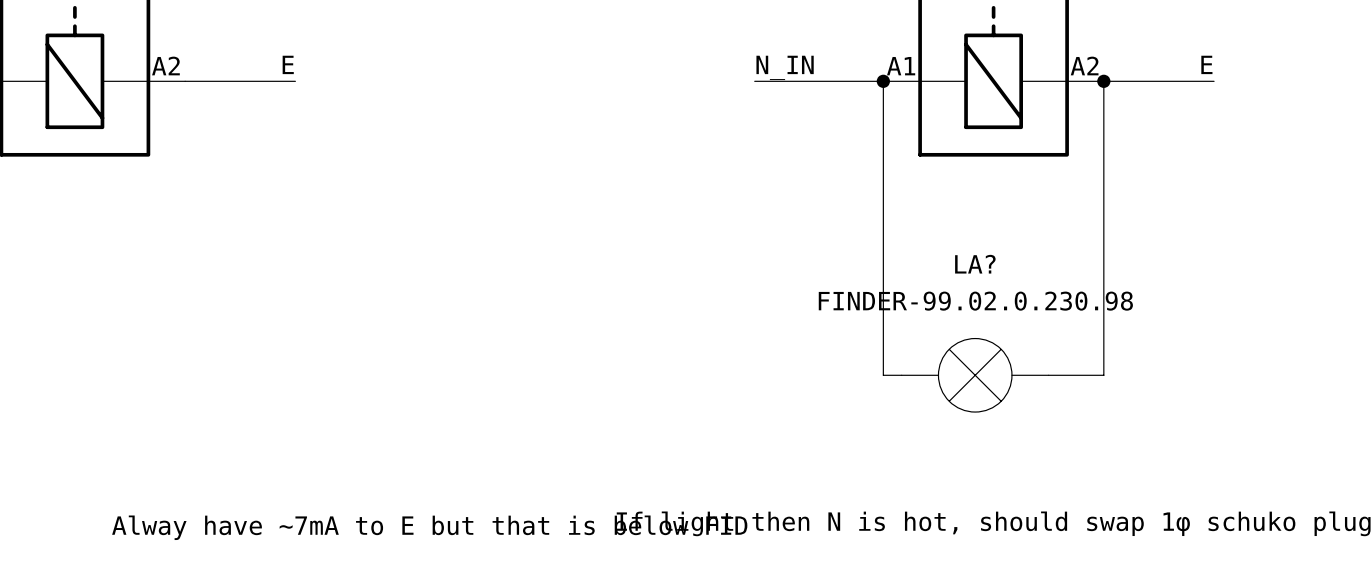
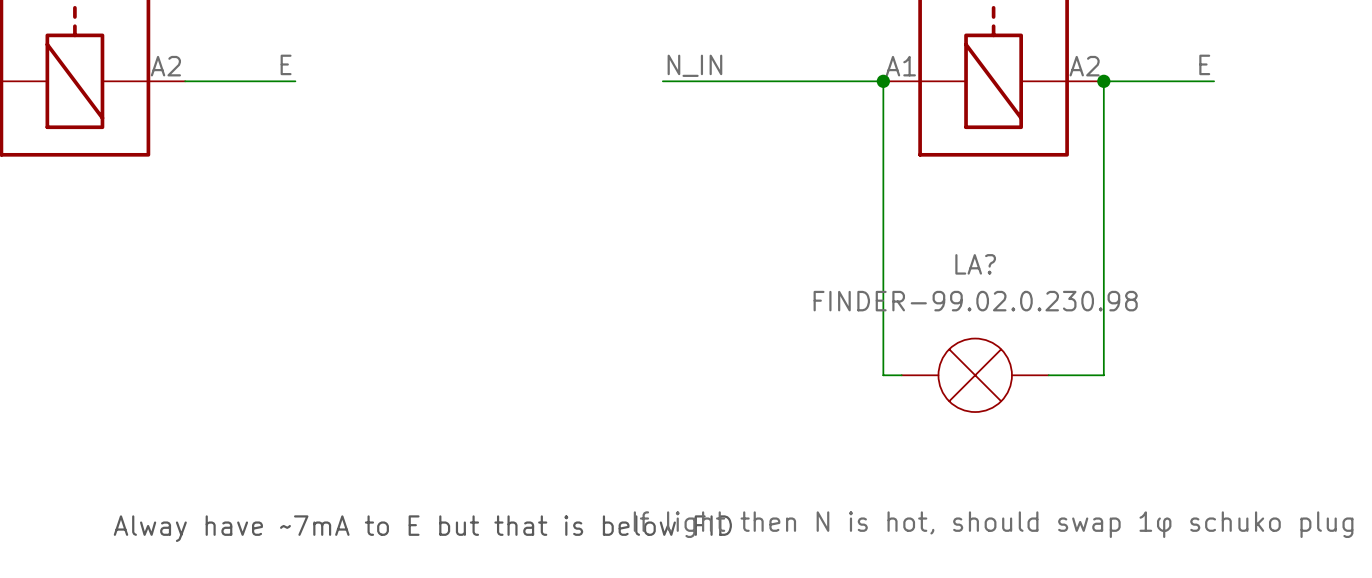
label position: N_IN (785, 67) -> N_IN (694, 65)
wire: none -> (662, 81) (754, 81)

